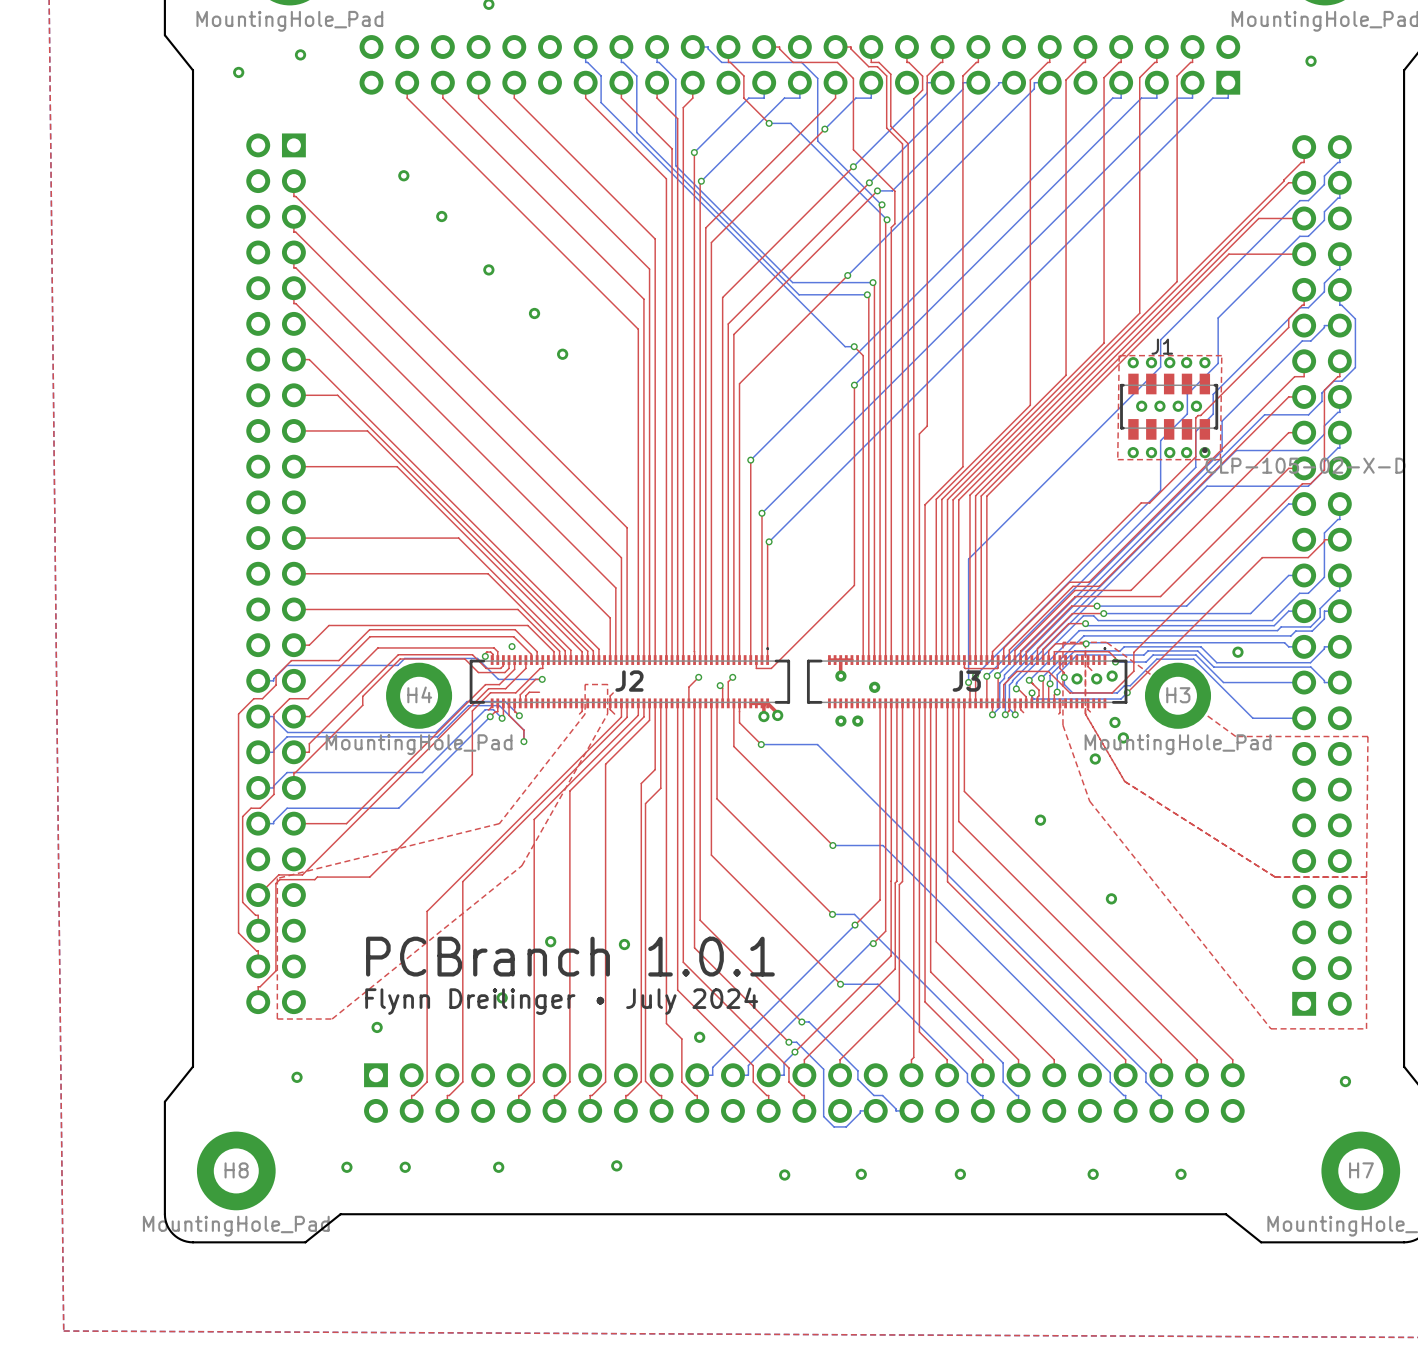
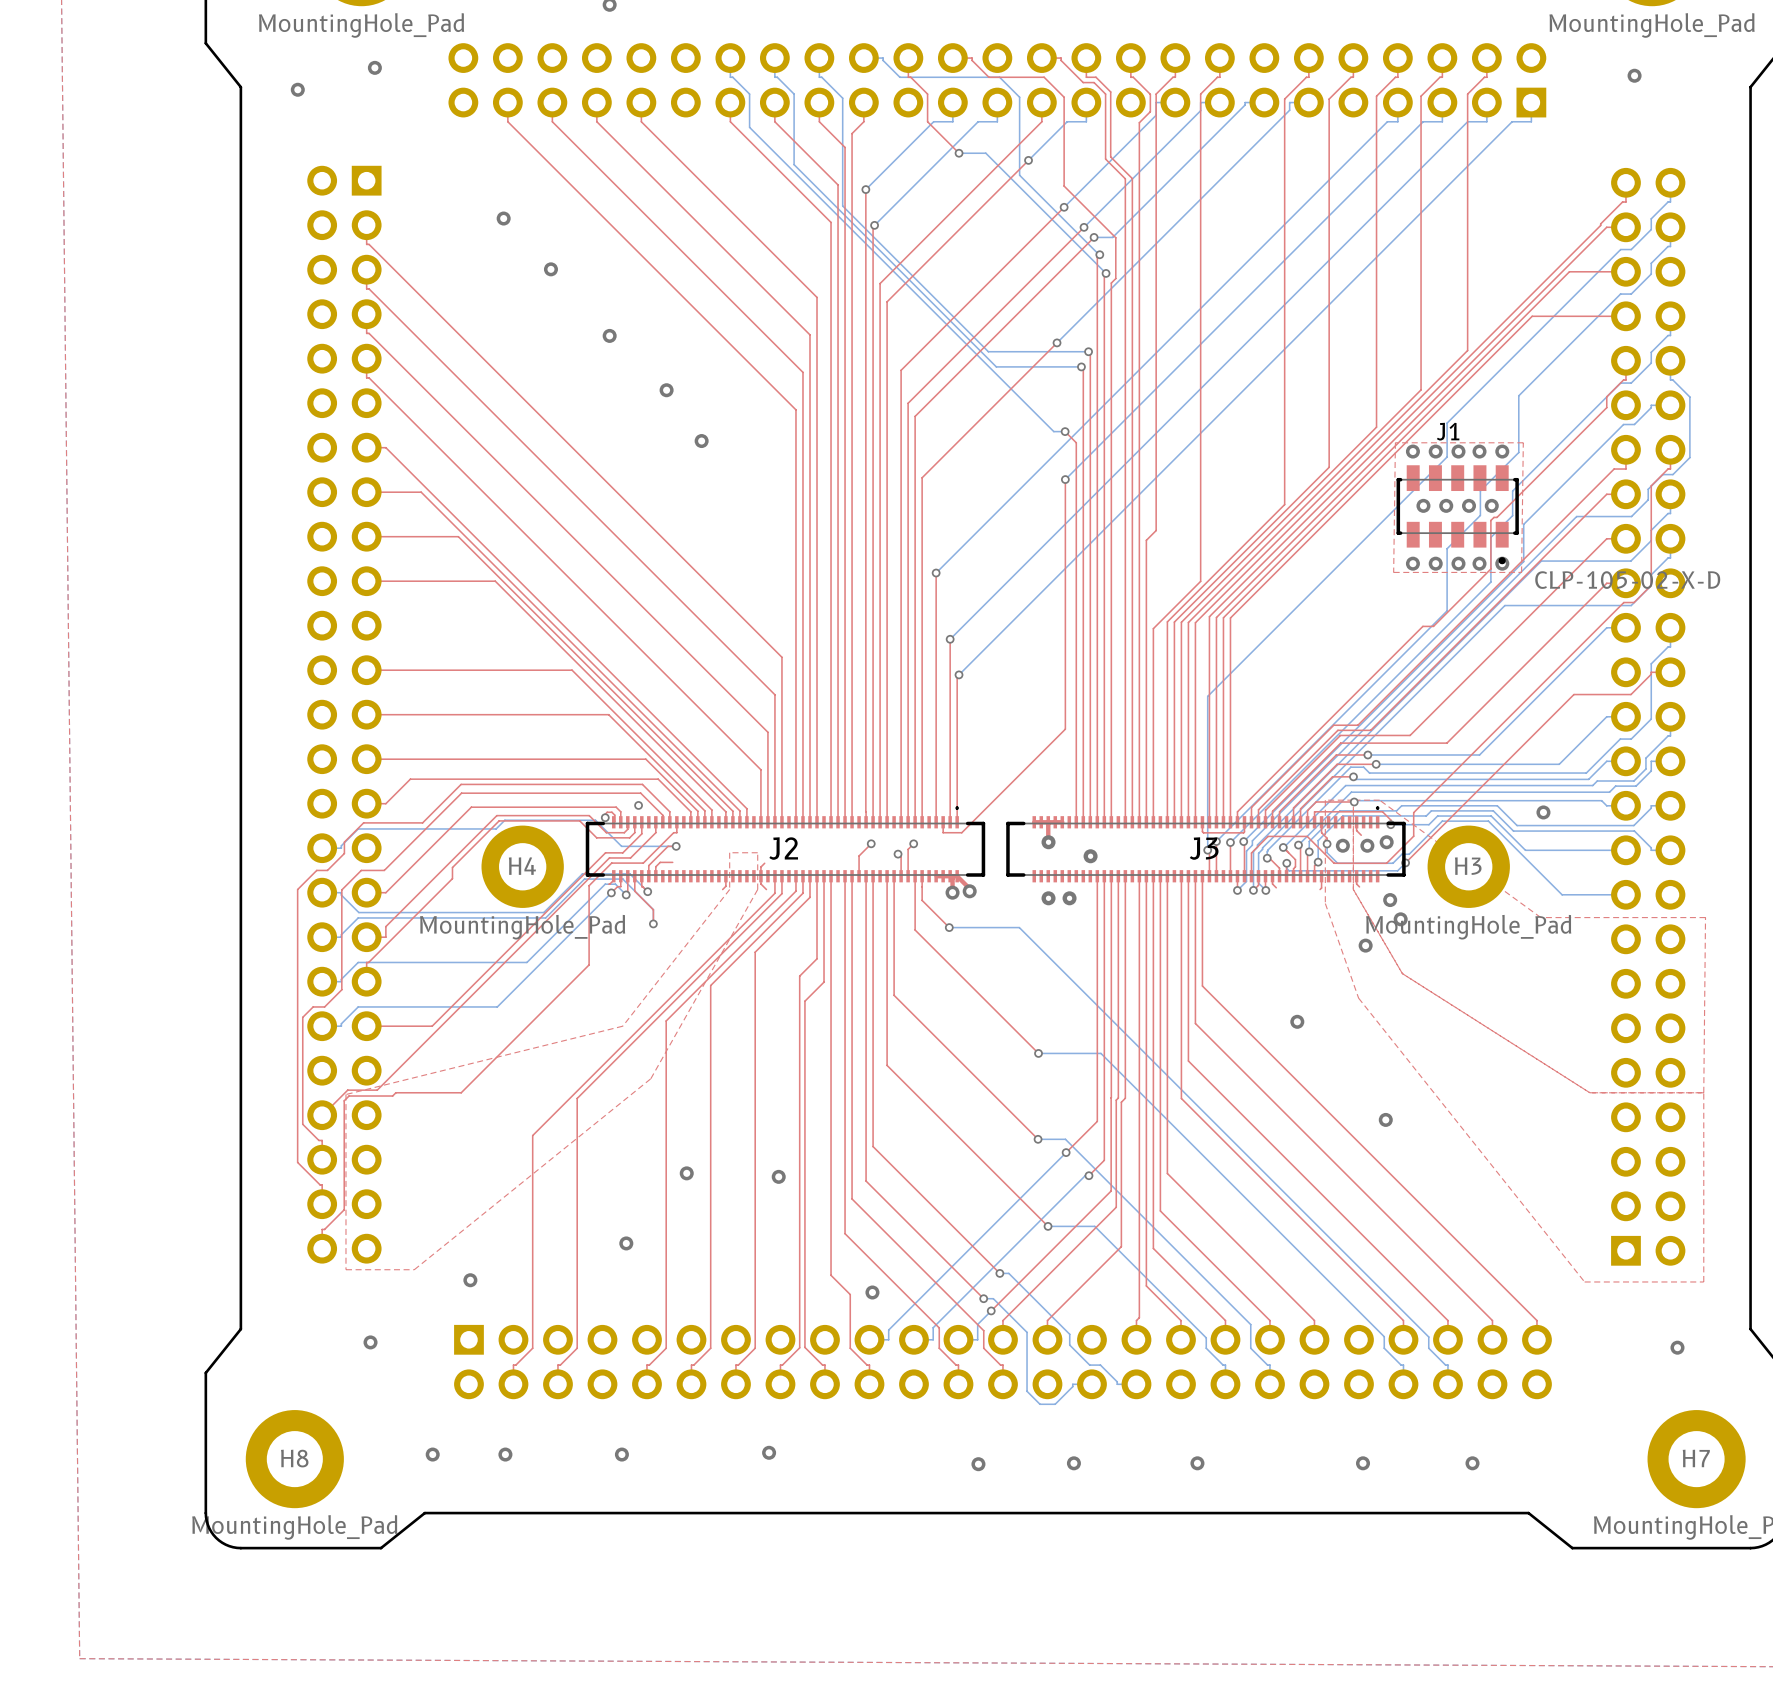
text: PCBranch 1.0.1 (570, 956) -> none
text: Flynn Dreilinger • July 2024 (561, 1001) -> none

